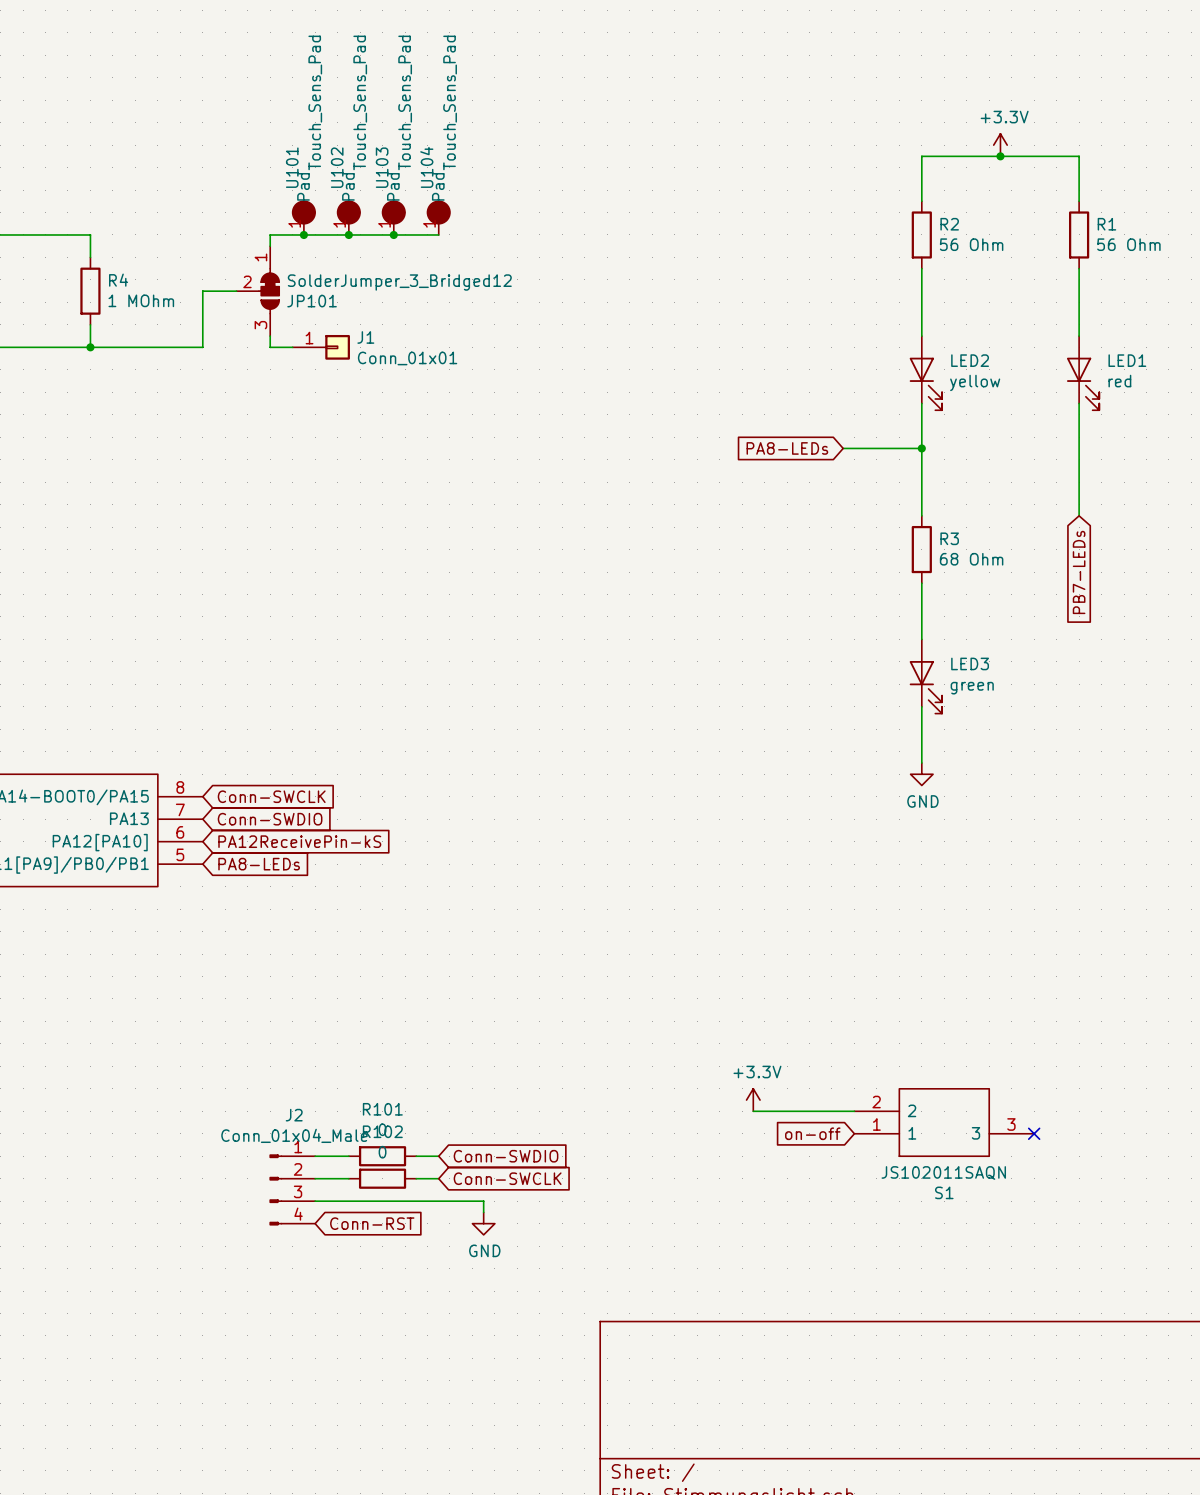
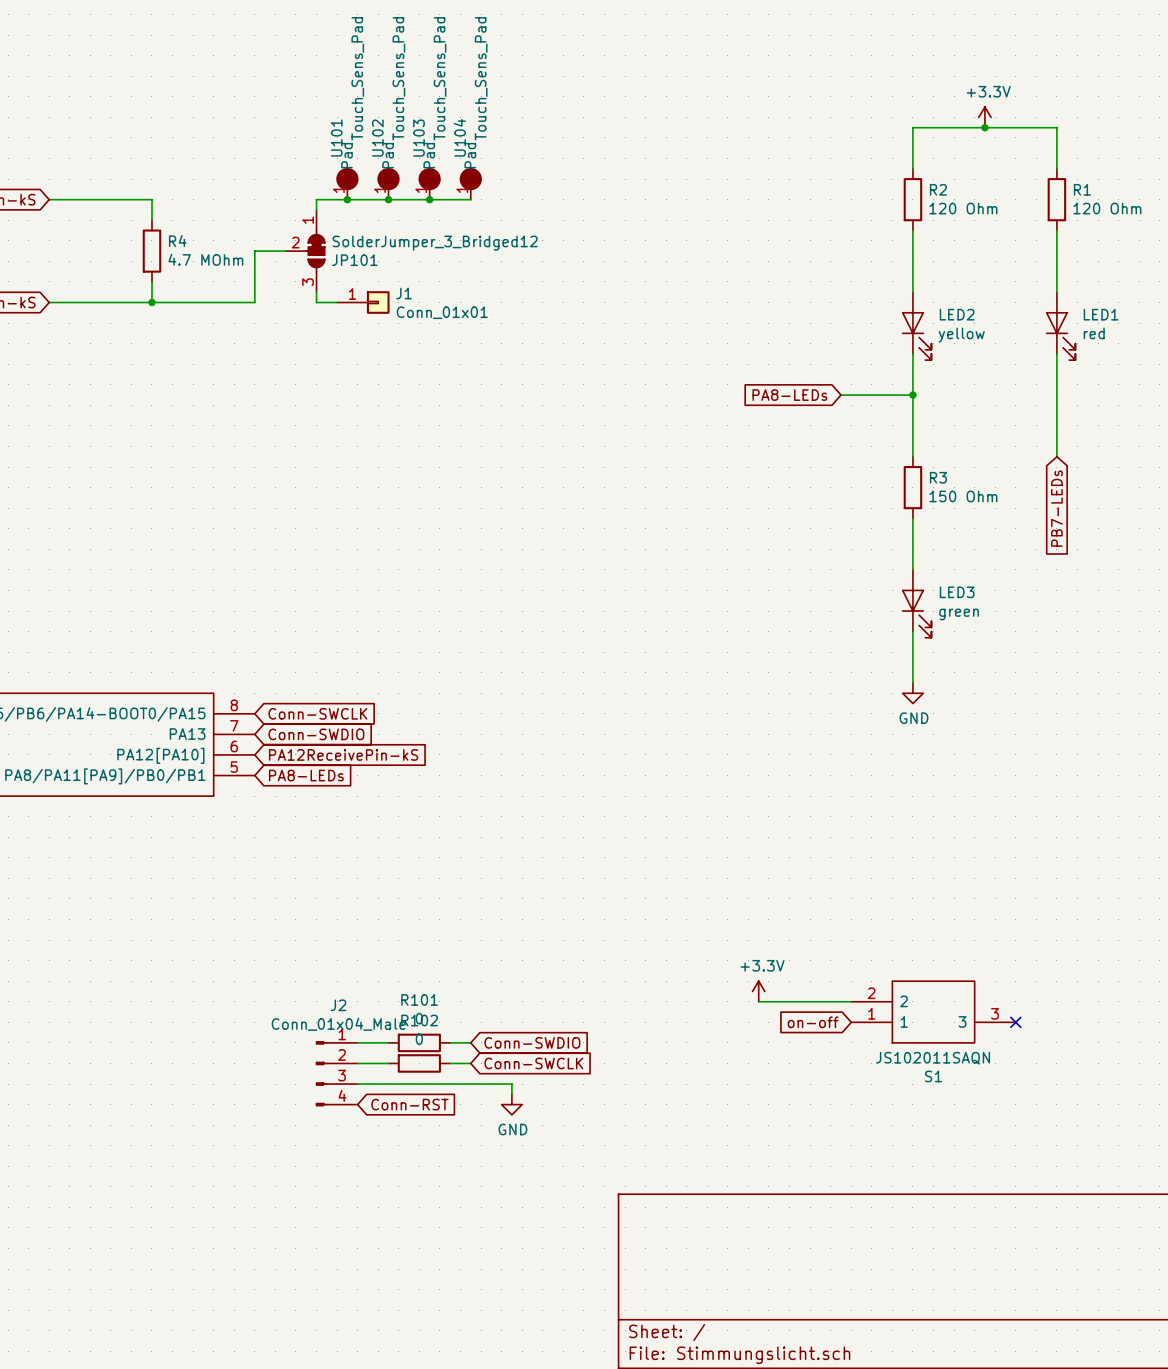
R2 value: 56 Ohm (971, 244) -> 120 Ohm (963, 208)
R1 value: 56 Ohm (1128, 244) -> 120 Ohm (1107, 208)
R4 value: 1 MOhm (141, 300) -> 4.7 MOhm (205, 259)
R3 value: 68 Ohm (971, 559) -> 150 Ohm (963, 496)

